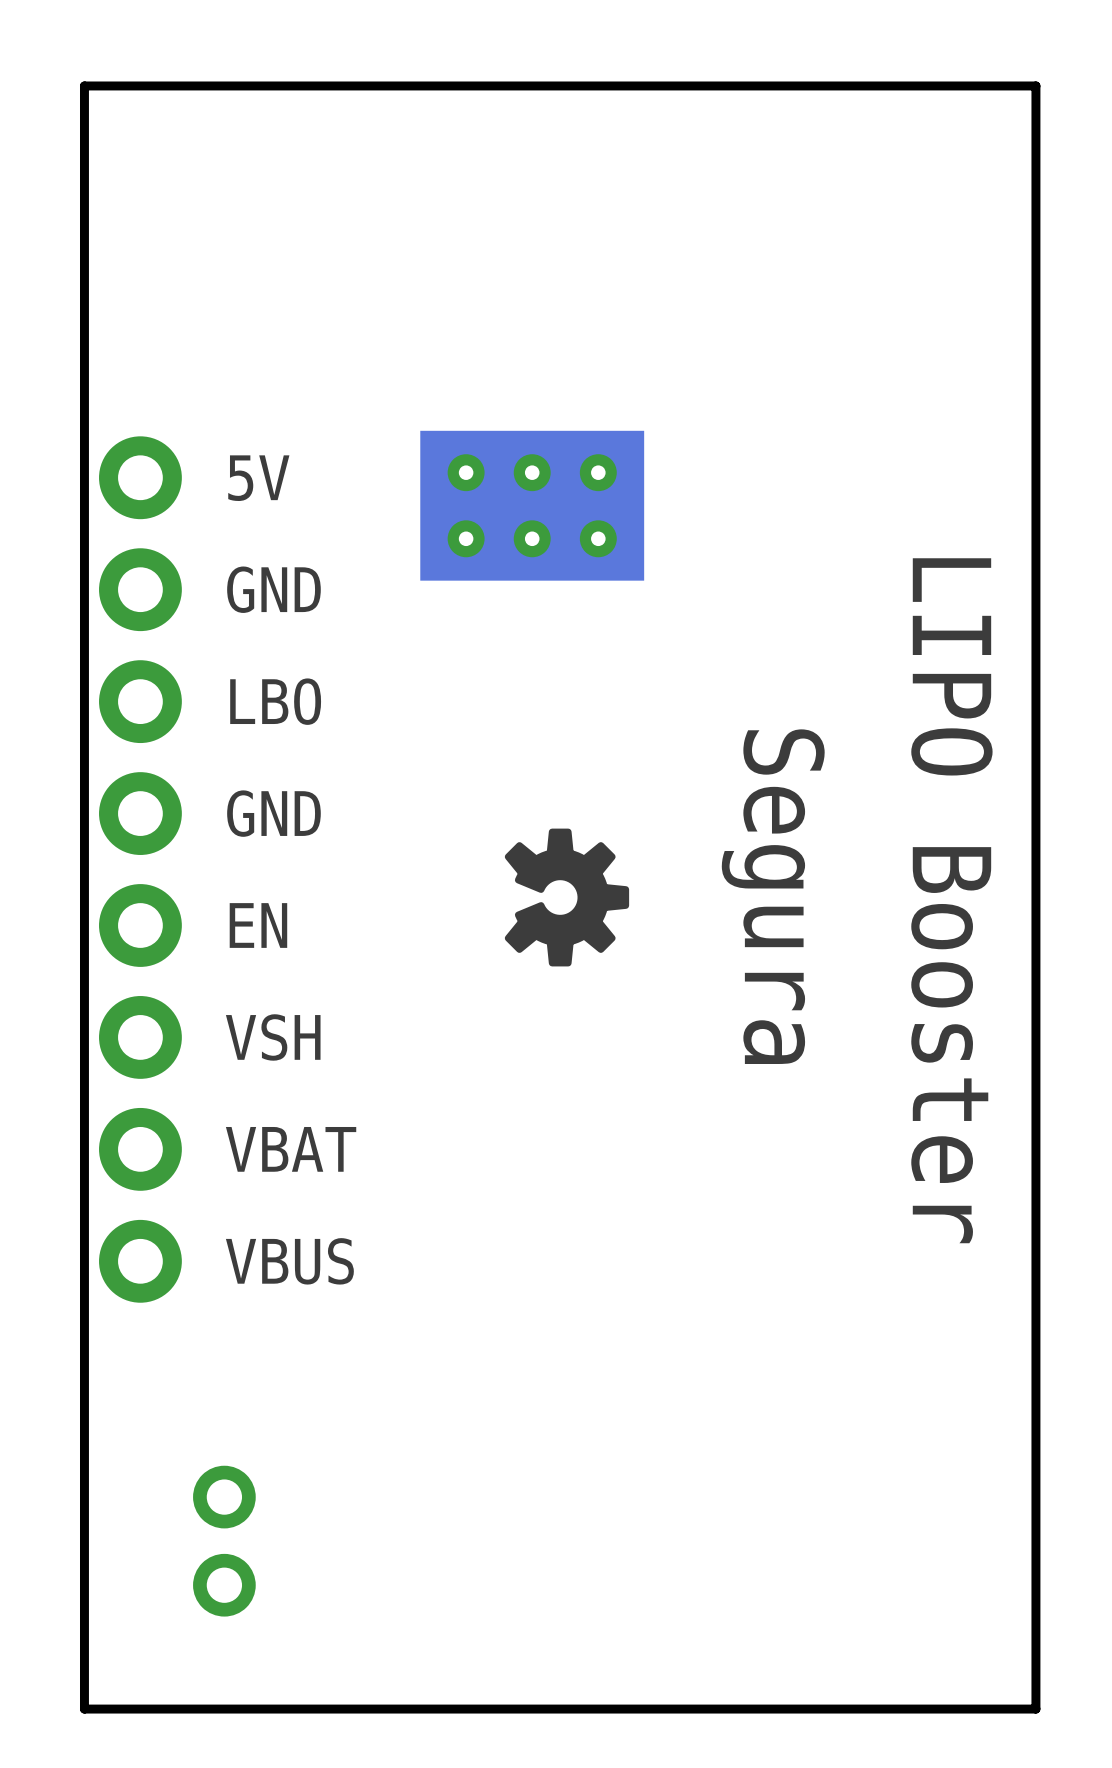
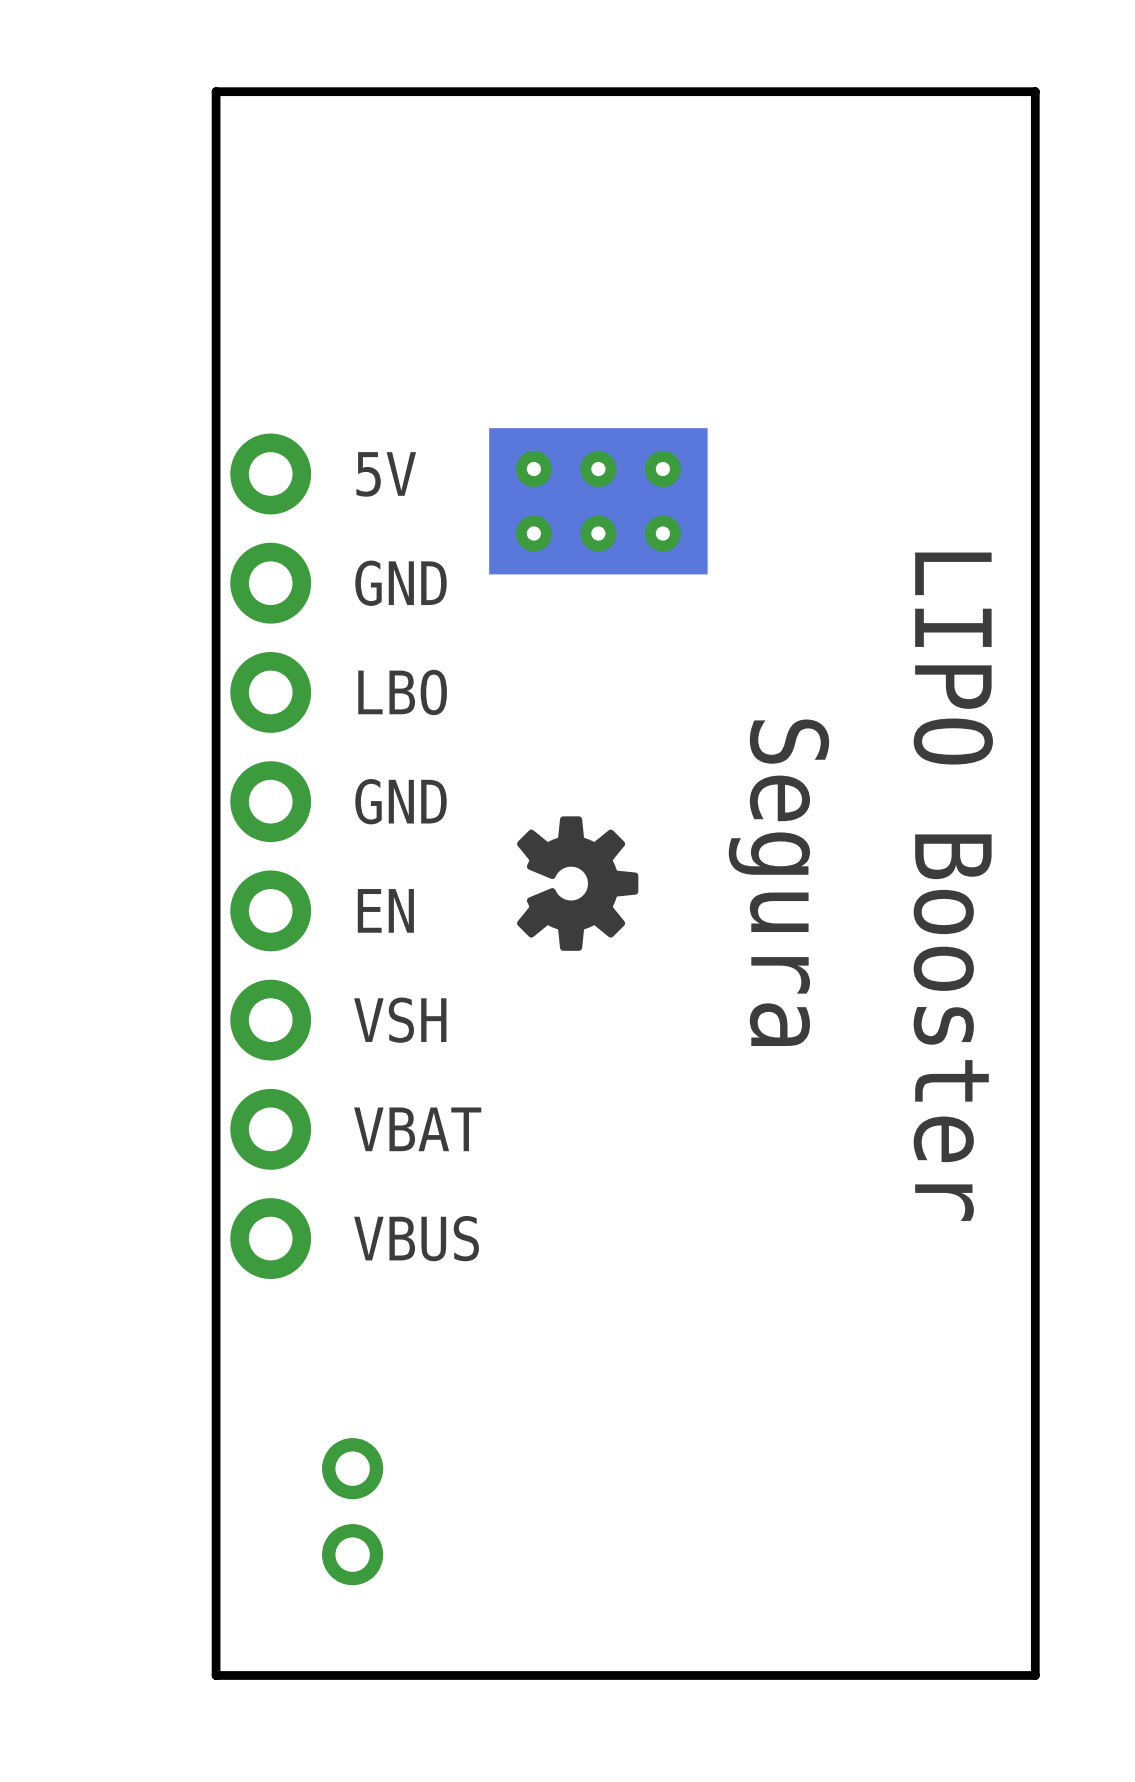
board edge: (196, 85) (84, 85) (84, 1709) (196, 1709) -> (216, 91) (216, 1675)
text position: 5V (258, 478) -> 5V (386, 474)
part position: (532, 505) -> (598, 501)
text position: GND (273, 589) -> GND (401, 583)
text position: LBO (275, 701) -> LBO (402, 692)
text position: GND (273, 813) -> GND (401, 801)
part position: (140, 869) -> (270, 856)
text position: EN (258, 925) -> EN (385, 910)
text position: VSH (273, 1037) -> VSH (400, 1020)
text position: VBAT (291, 1149) -> VBAT (417, 1129)
text position: VBUS (289, 1261) -> VBUS (416, 1238)
part position: (224, 1541) -> (352, 1511)

